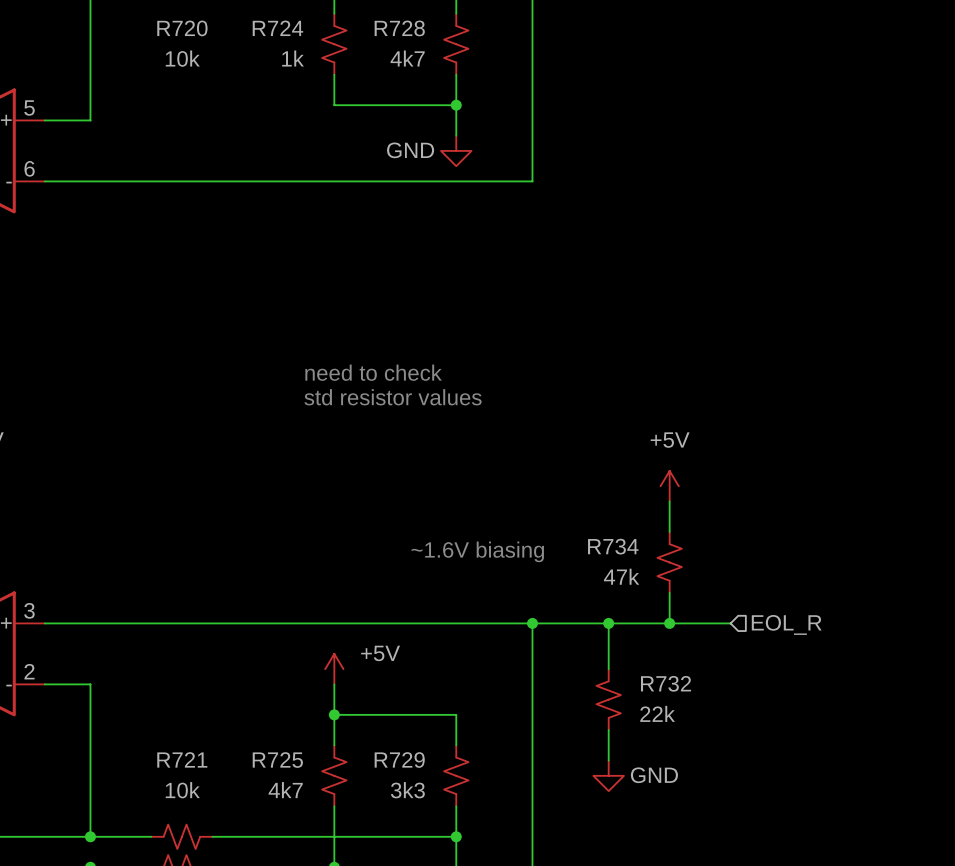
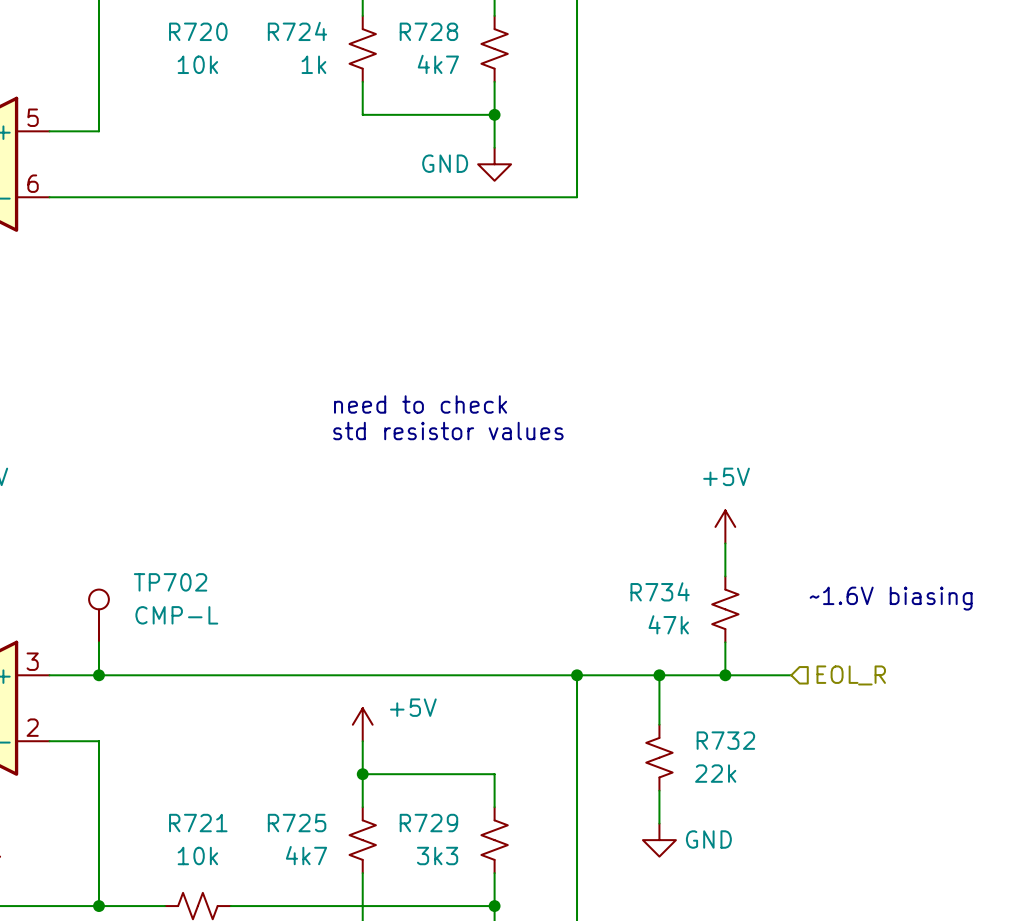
text: ~1.6V biasing (477, 551) -> none
text: none -> ~1.6V biasing (891, 598)
TP702: none -> CMP-L (98, 615)
wire: none -> (98, 642) (98, 675)
junction: none -> (98, 675)

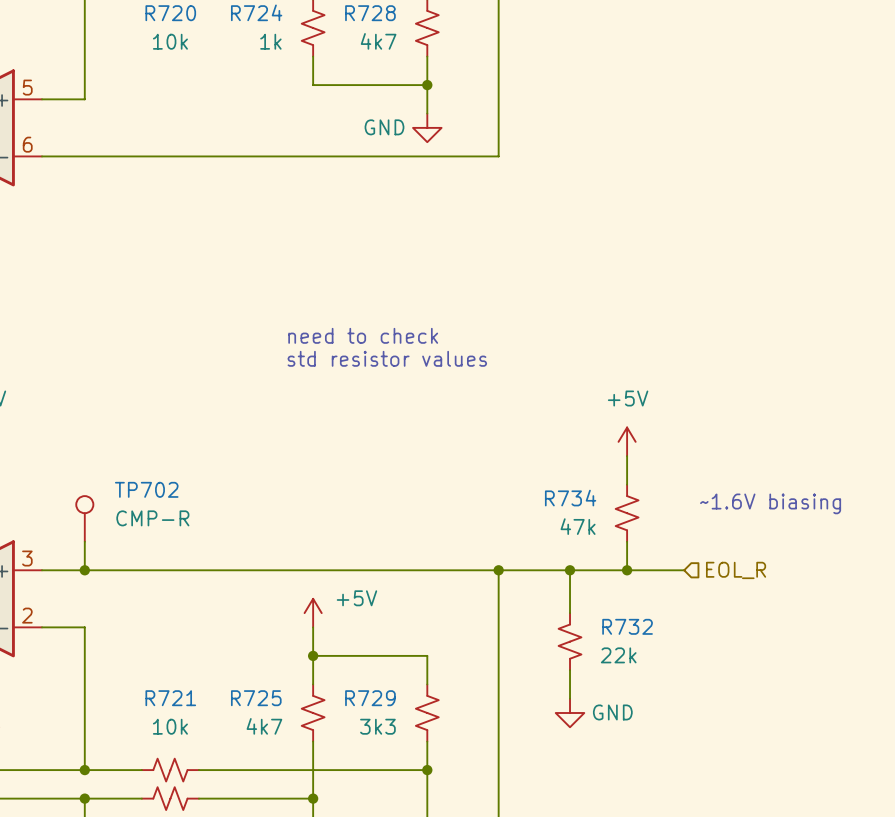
TP702 value: CMP-L (176, 615) -> CMP-R (152, 518)

